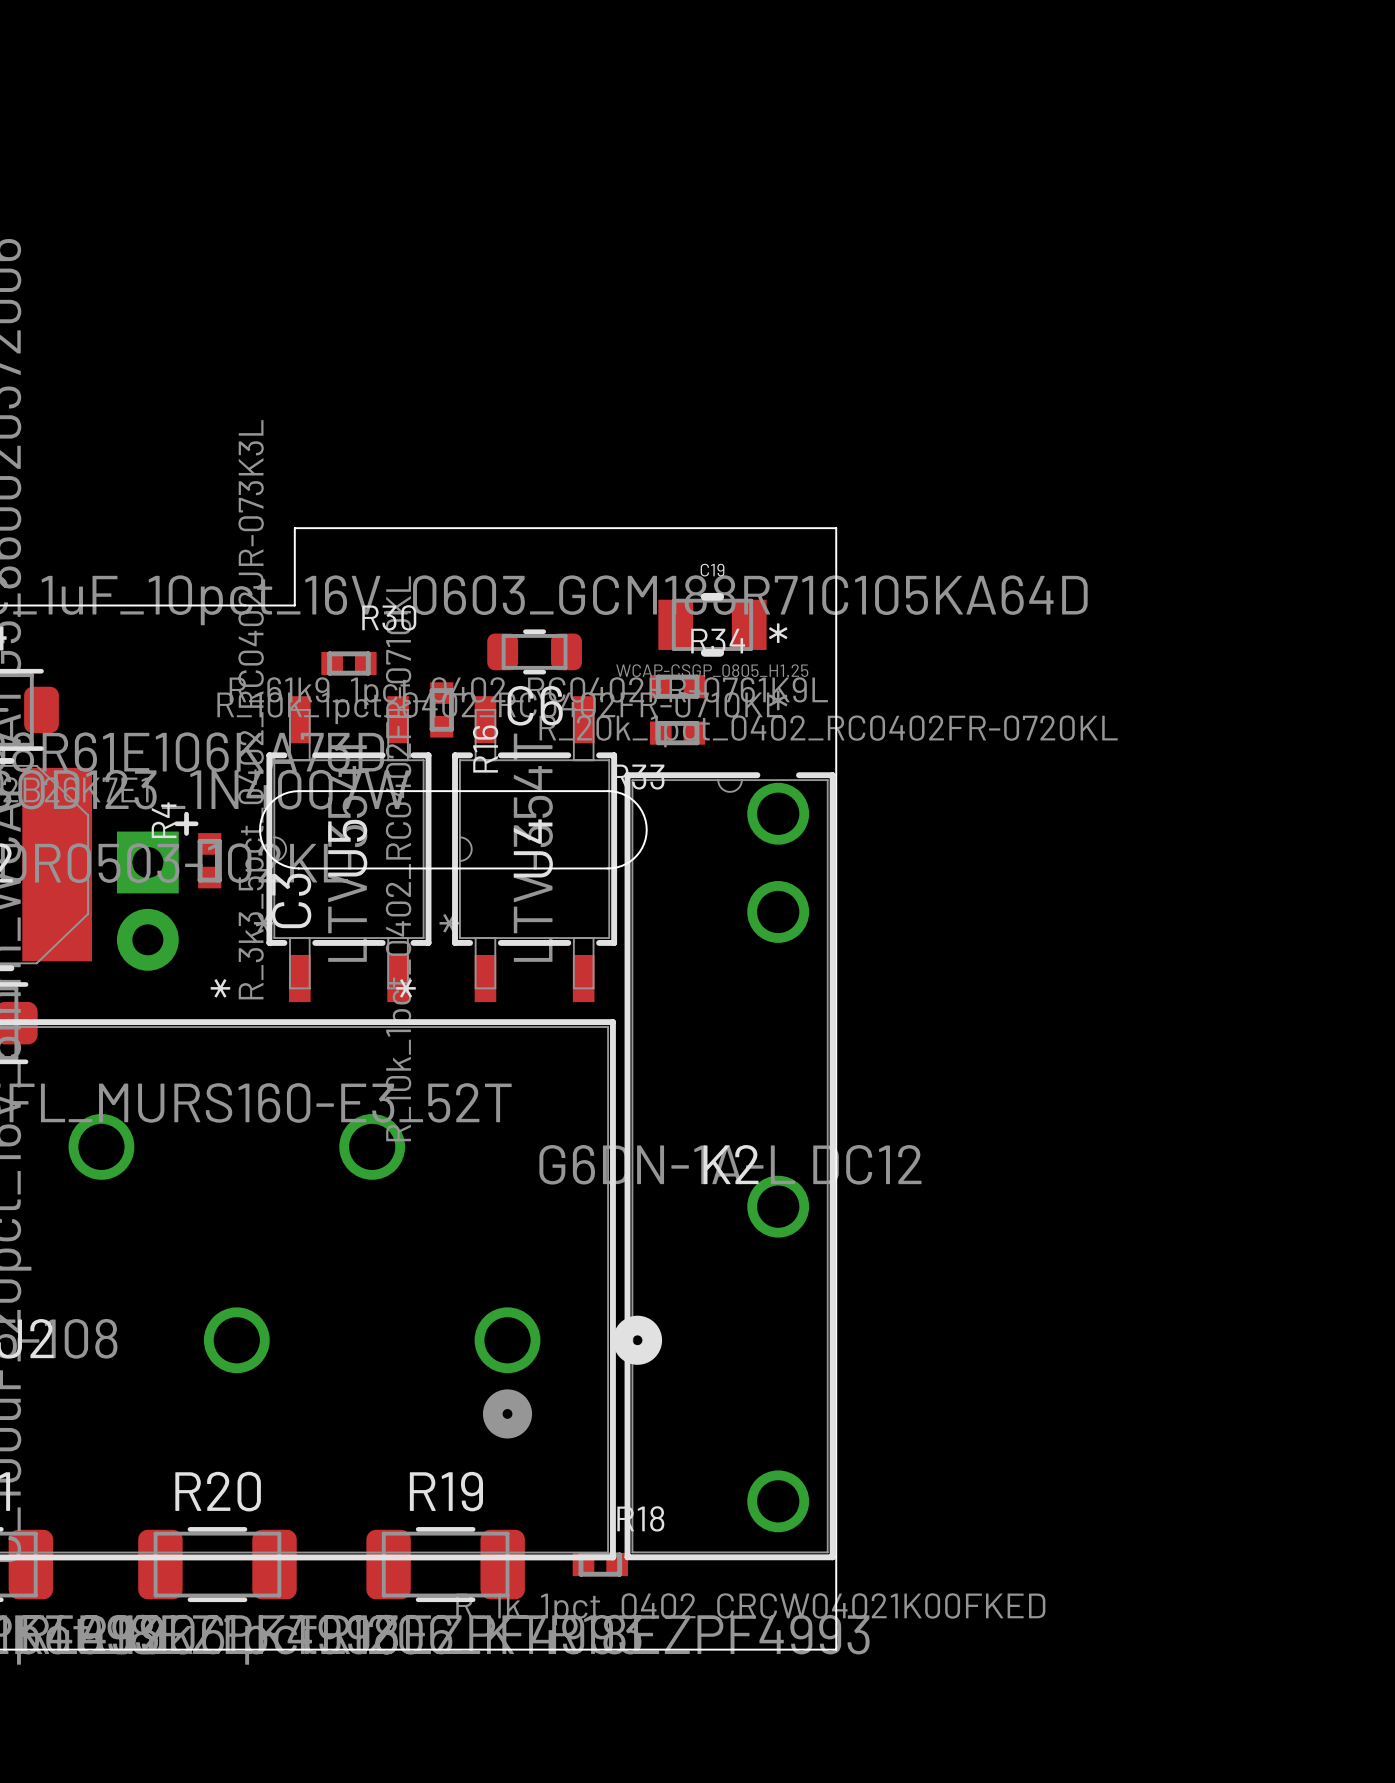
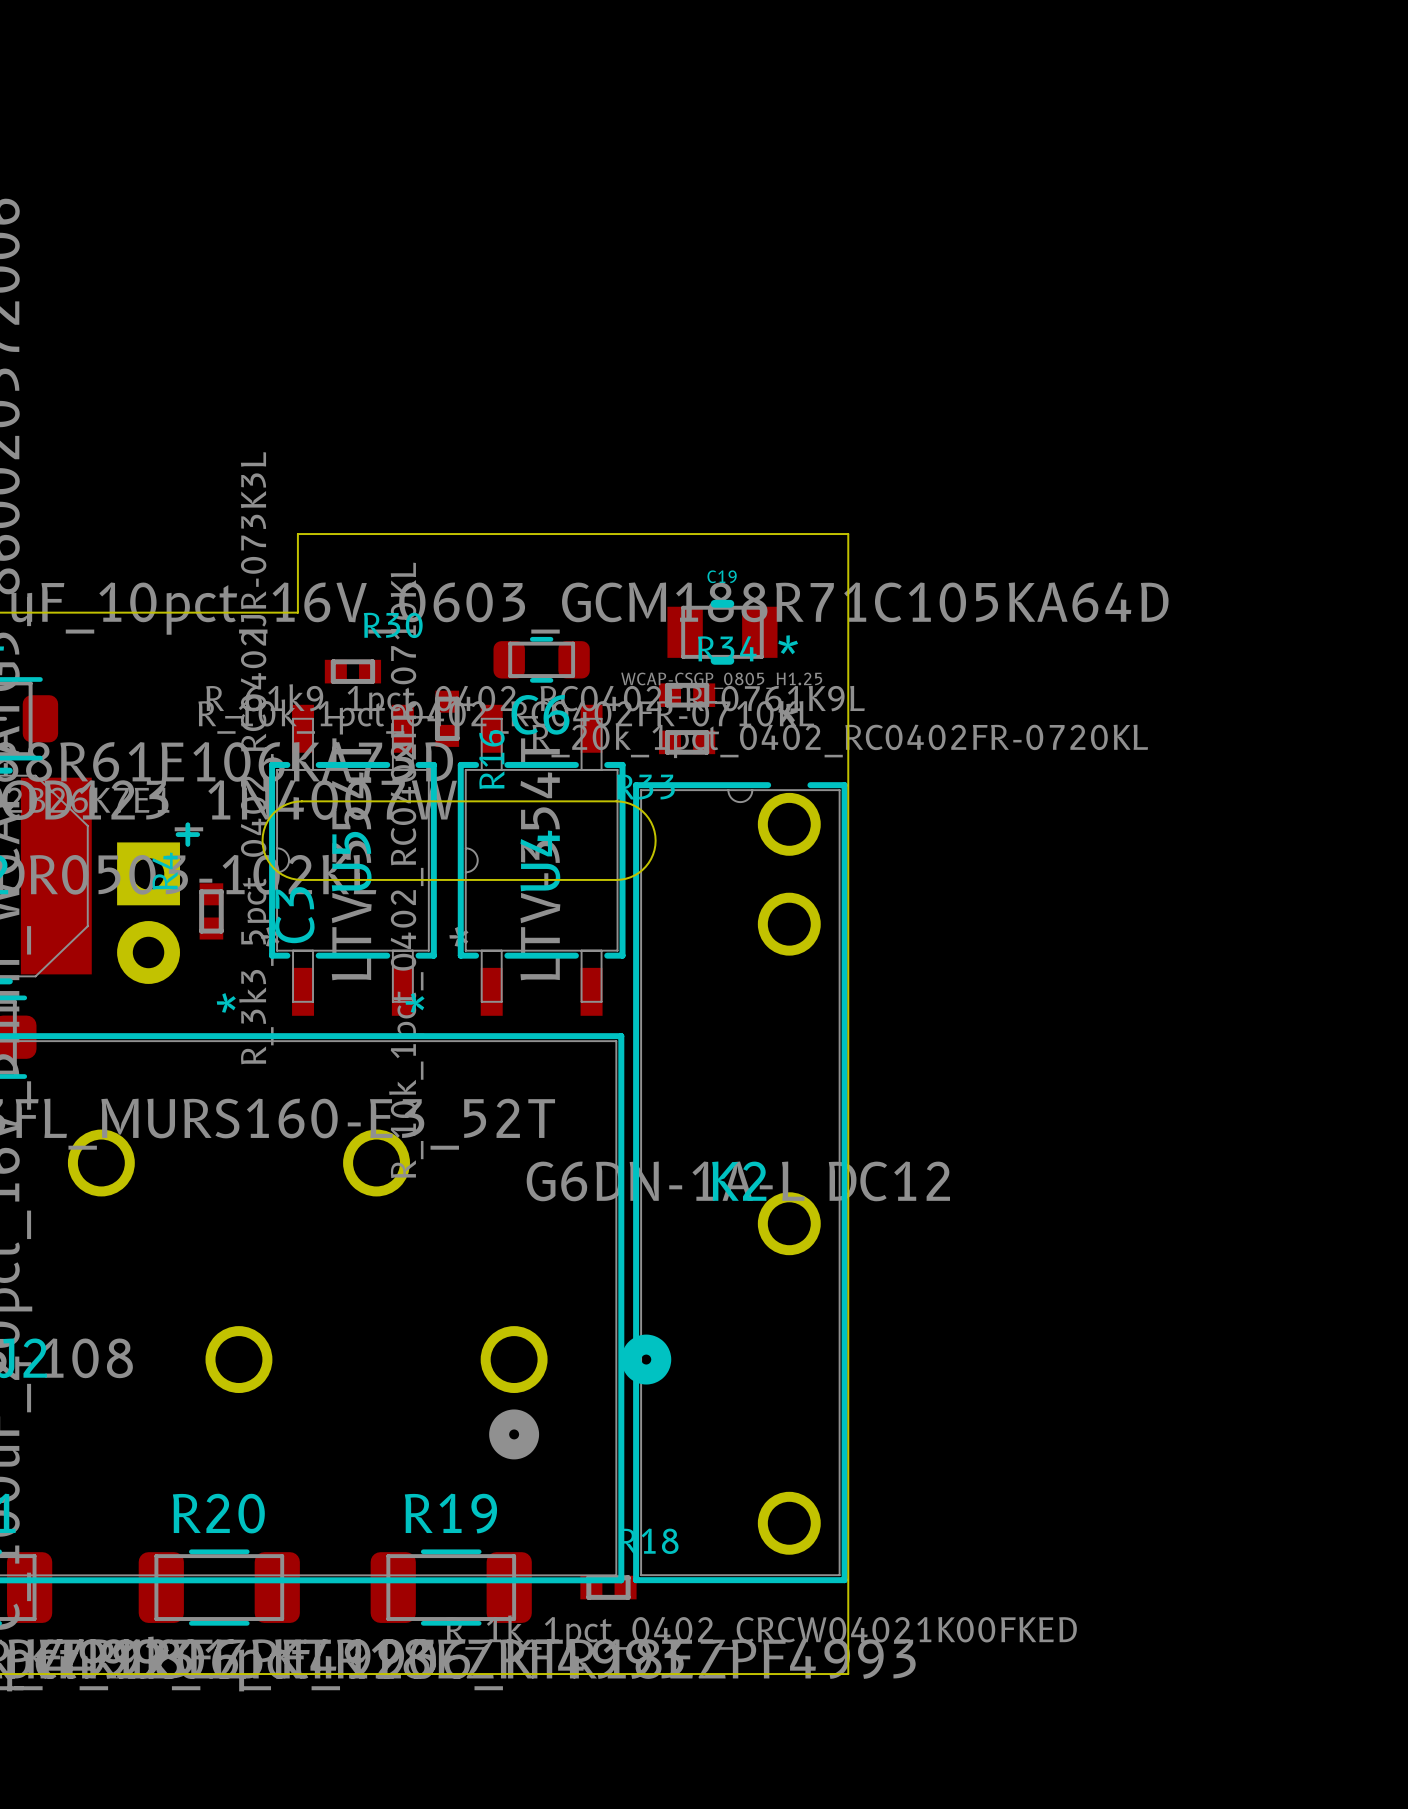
R4 position: (209, 860) -> (211, 911)

